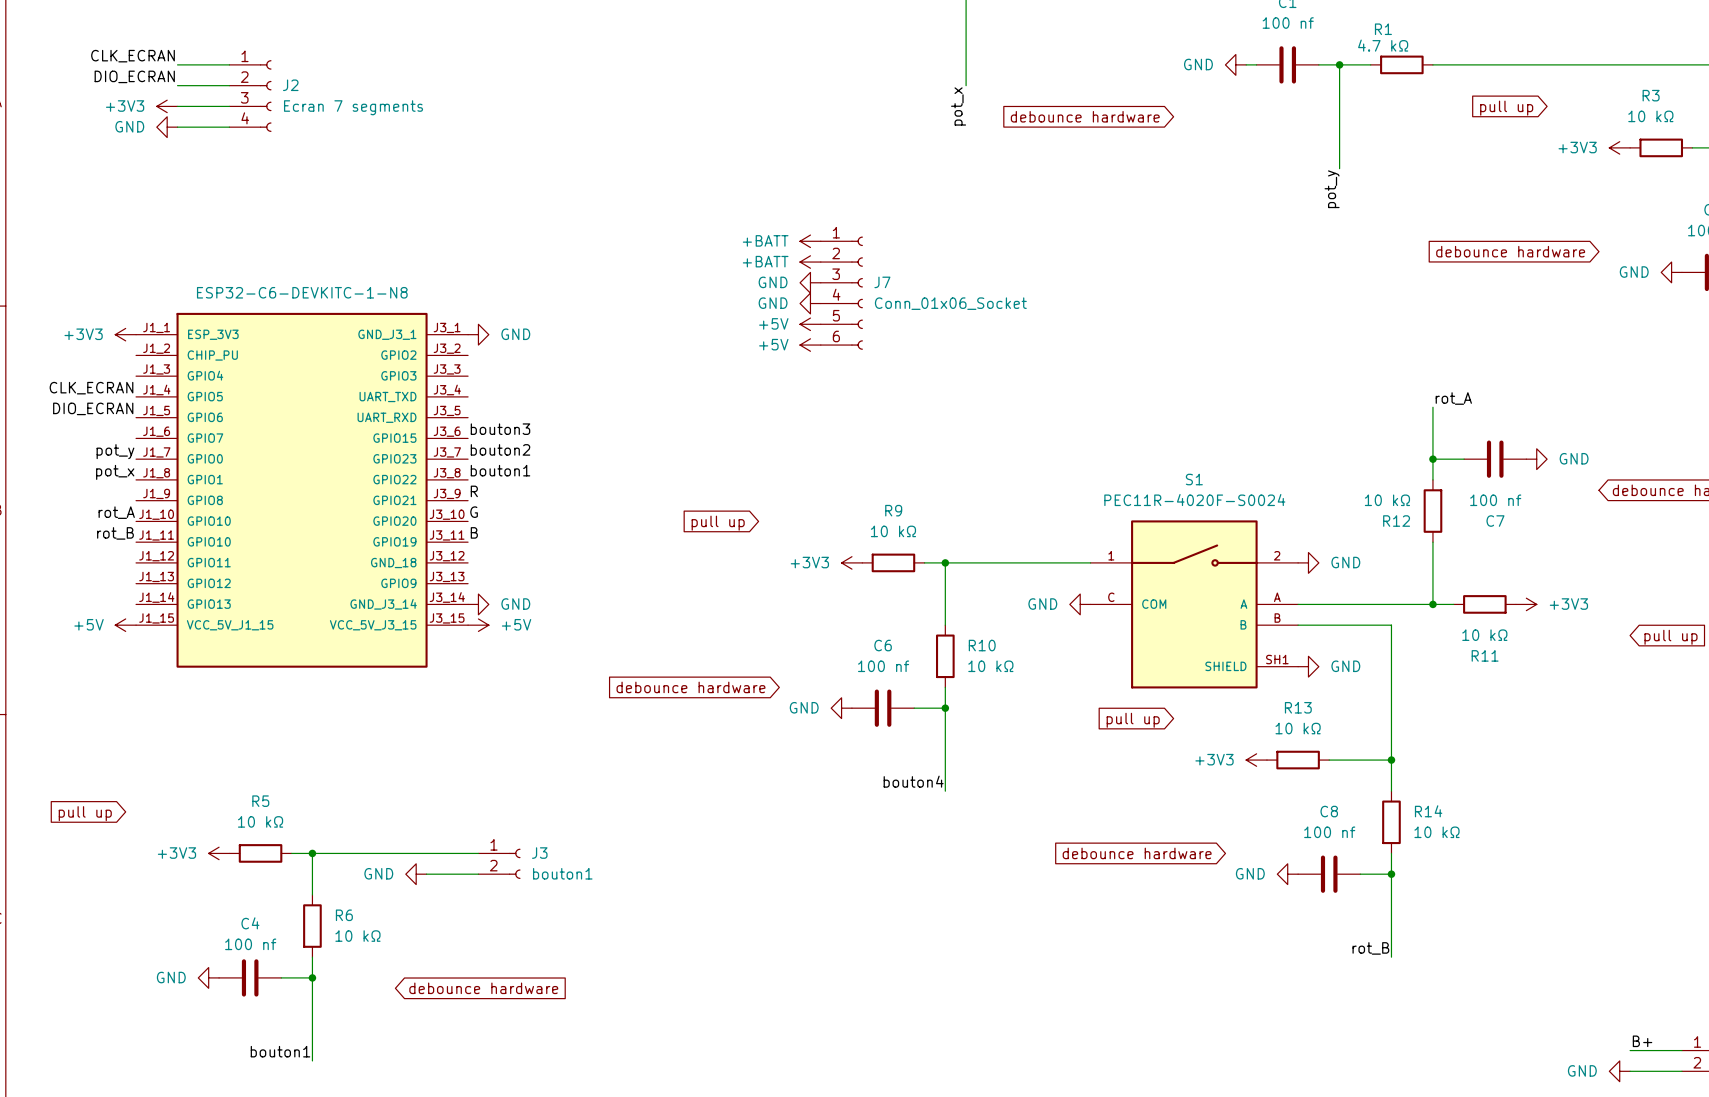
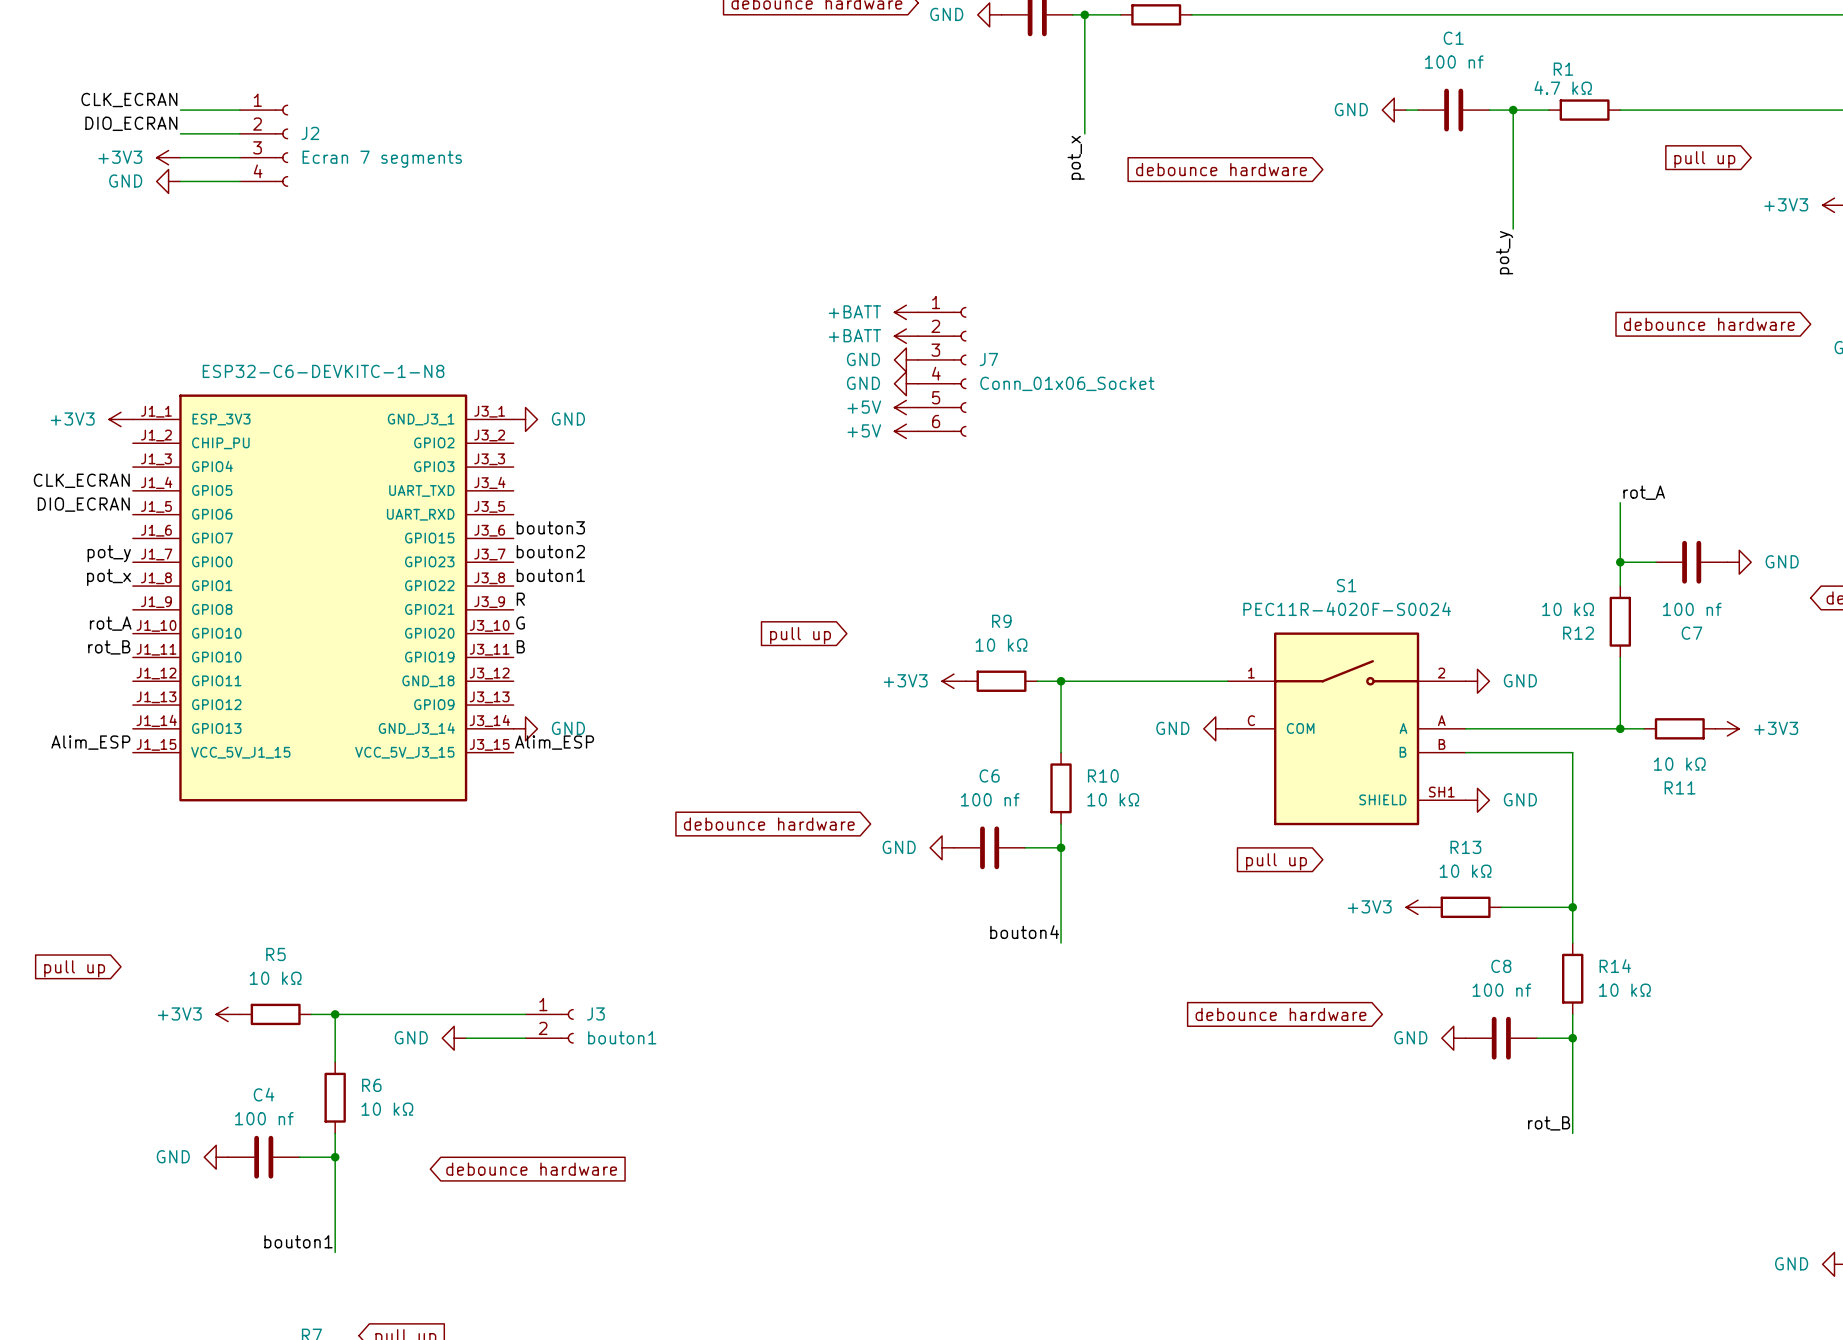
label: none -> Alim_ESP (90, 742)
label: none -> Alim_ESP (554, 742)
power symbol: +5V (125, 625) -> none
power symbol: +5V (478, 625) -> none

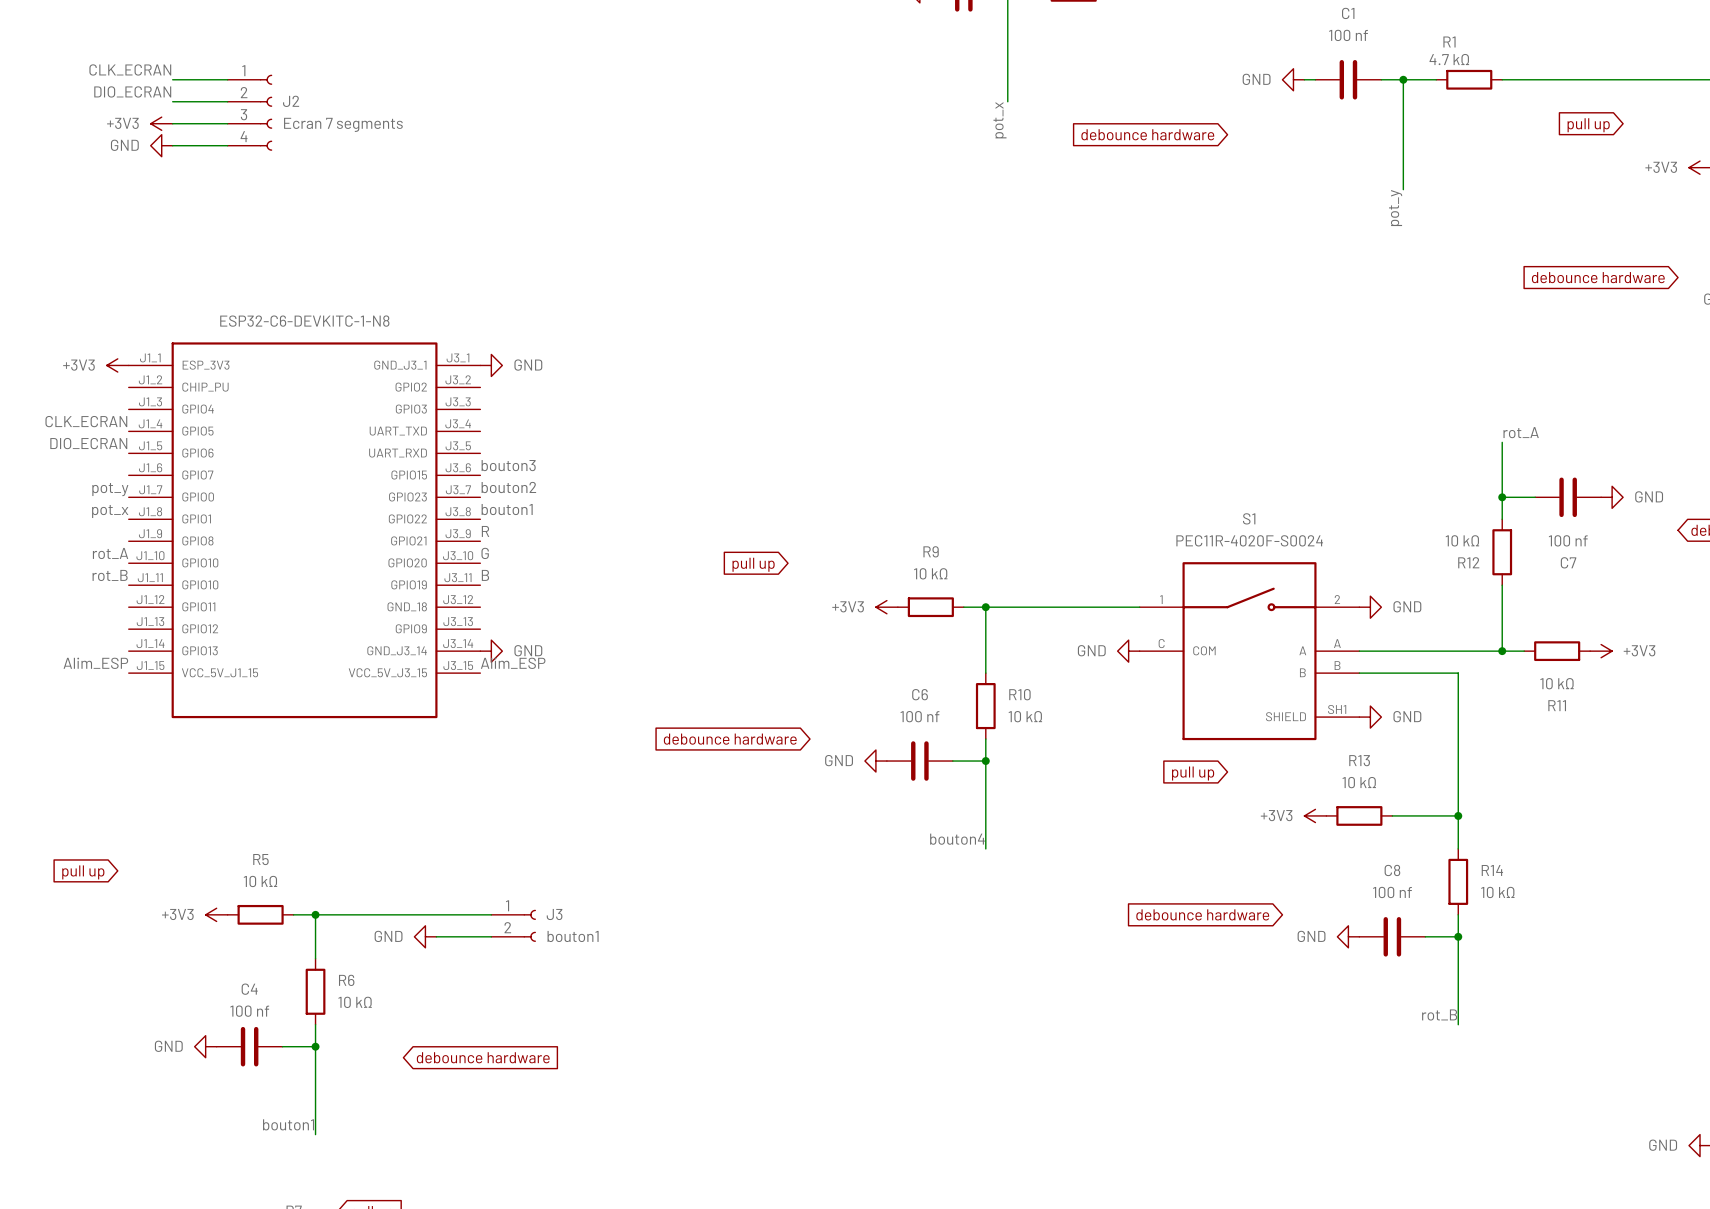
power symbol: +BATT (906, 312) -> none
power symbol: +BATT (906, 336) -> none
power symbol: GND (906, 359) -> none
J7: Conn_01x06_Socket (942, 371) -> none
power symbol: GND (906, 383) -> none
power symbol: +5V (906, 407) -> none
power symbol: +5V (906, 431) -> none

